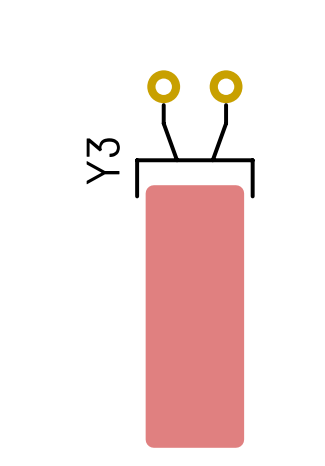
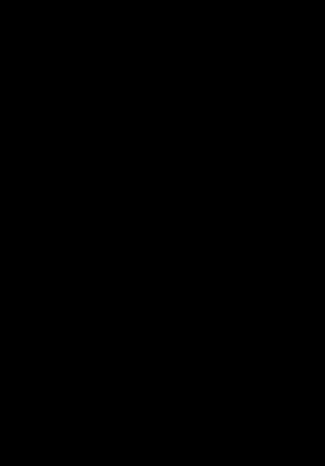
Y3: (194, 259) -> none

